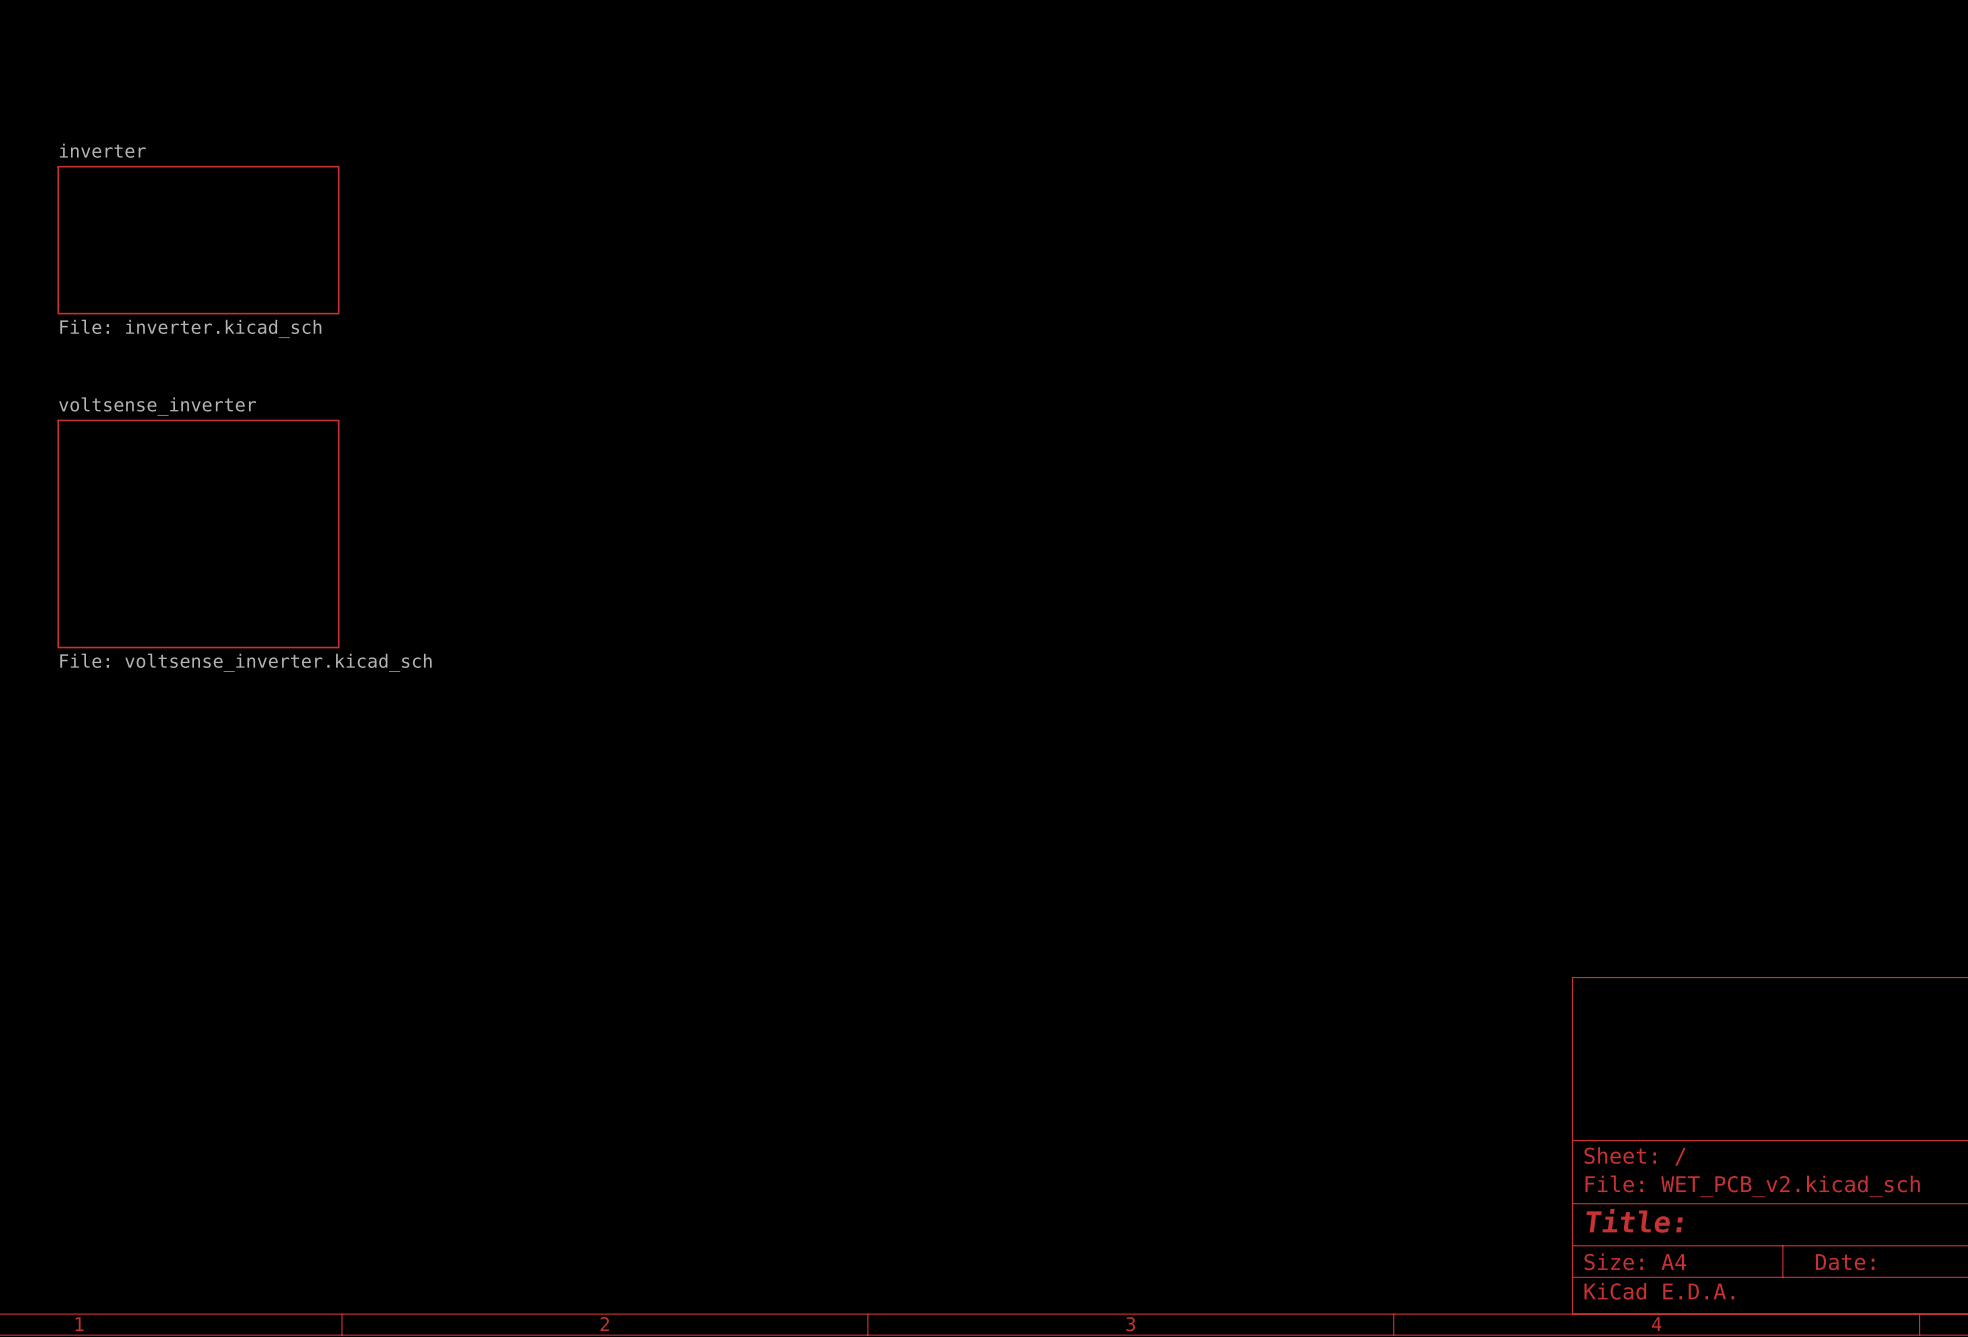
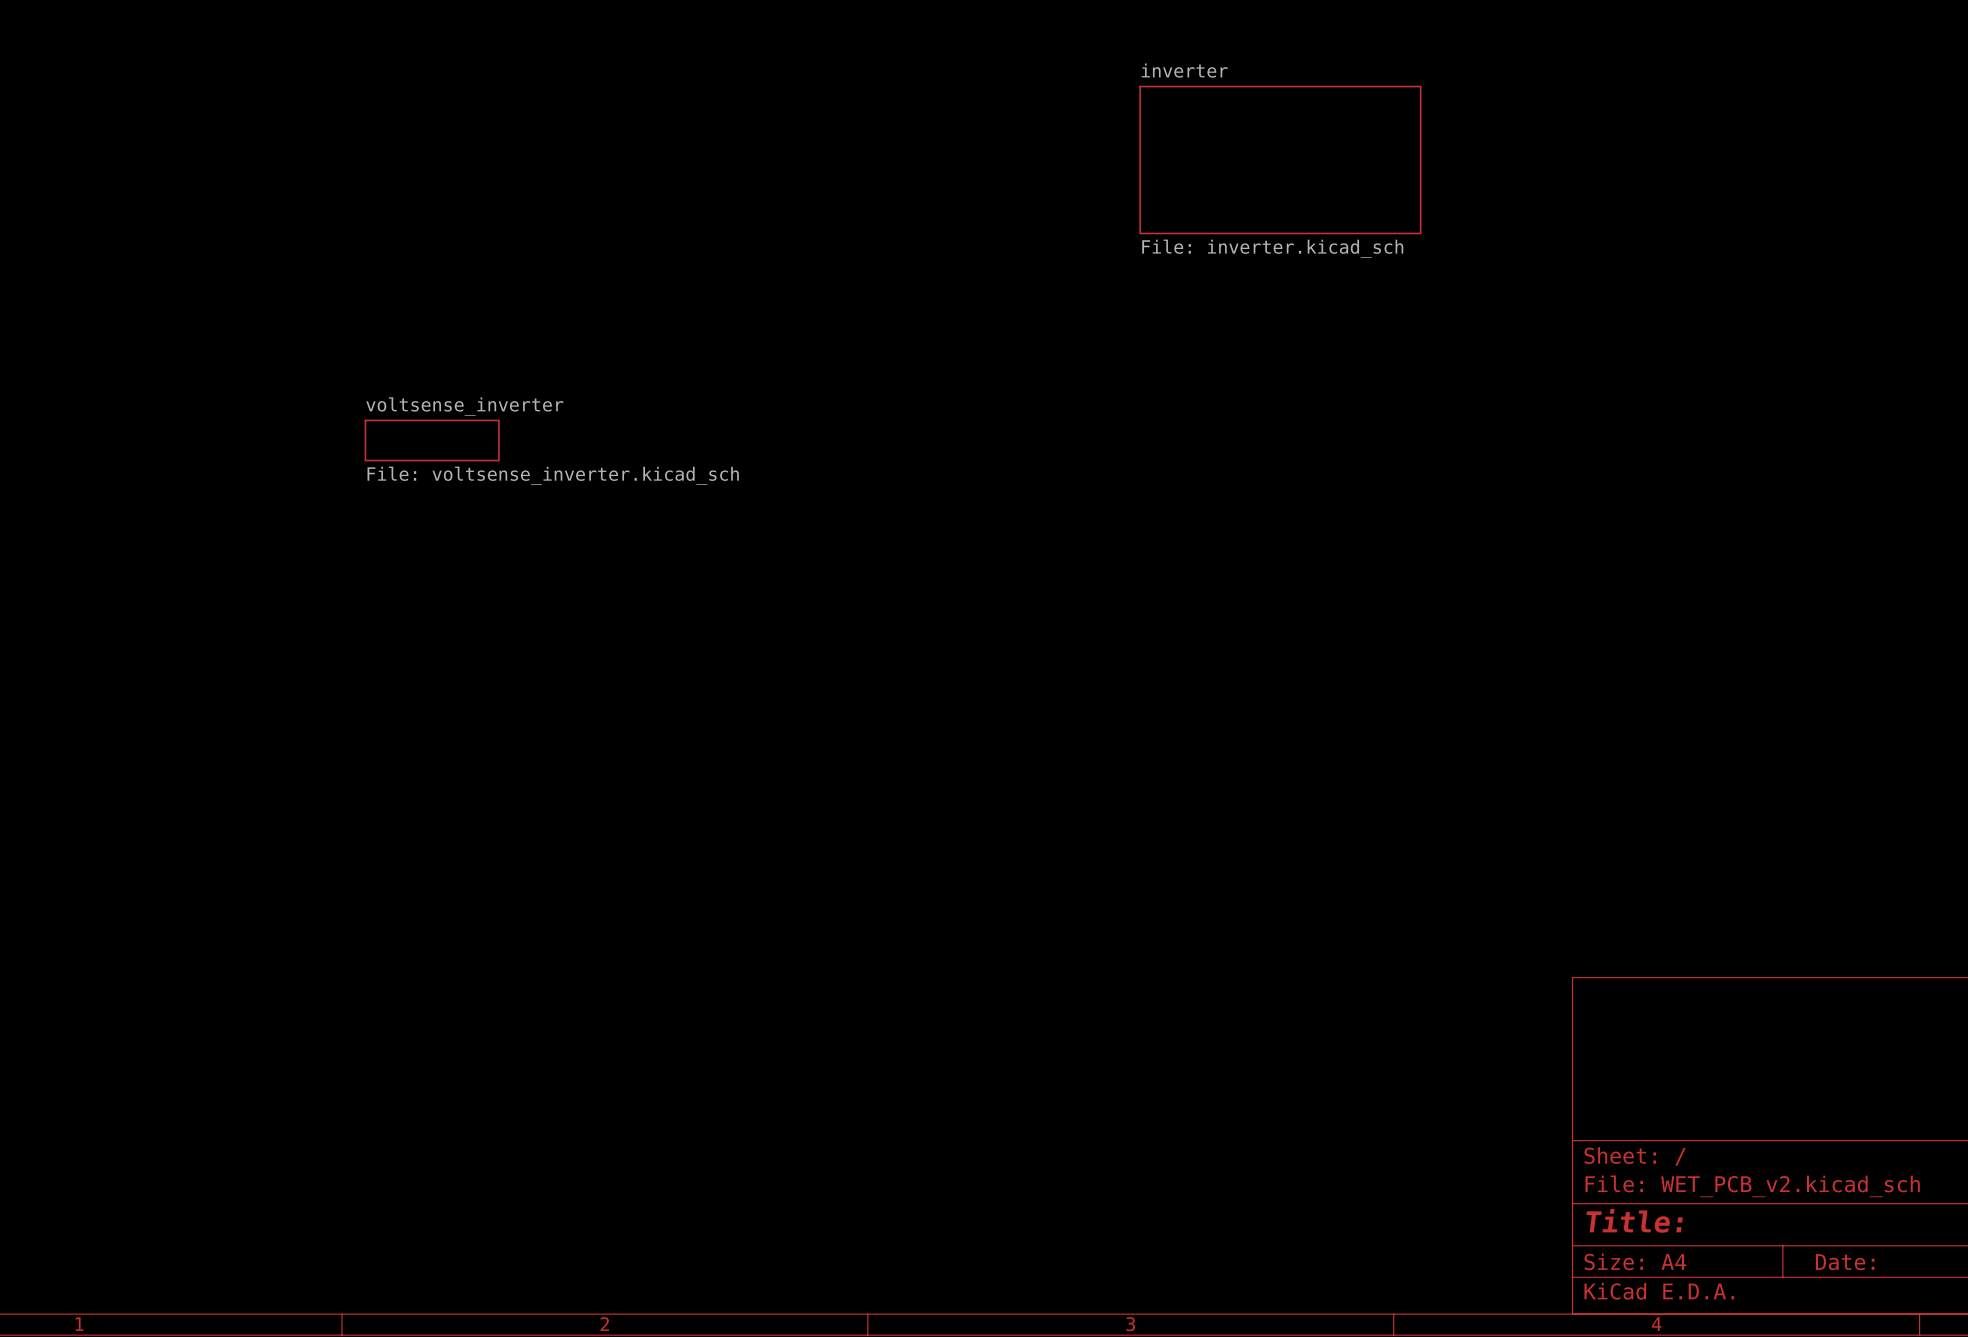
sheet inverter: none -> File: inverter.kicad_sch (1280, 160)
sheet inverter: File: inverter.kicad_sch (198, 240) -> none
sheet voltsense_inverter: none -> File: voltsense_inverter.kicad_sch (432, 440)
sheet voltsense_inverter: File: voltsense_inverter.kicad_sch (198, 534) -> none

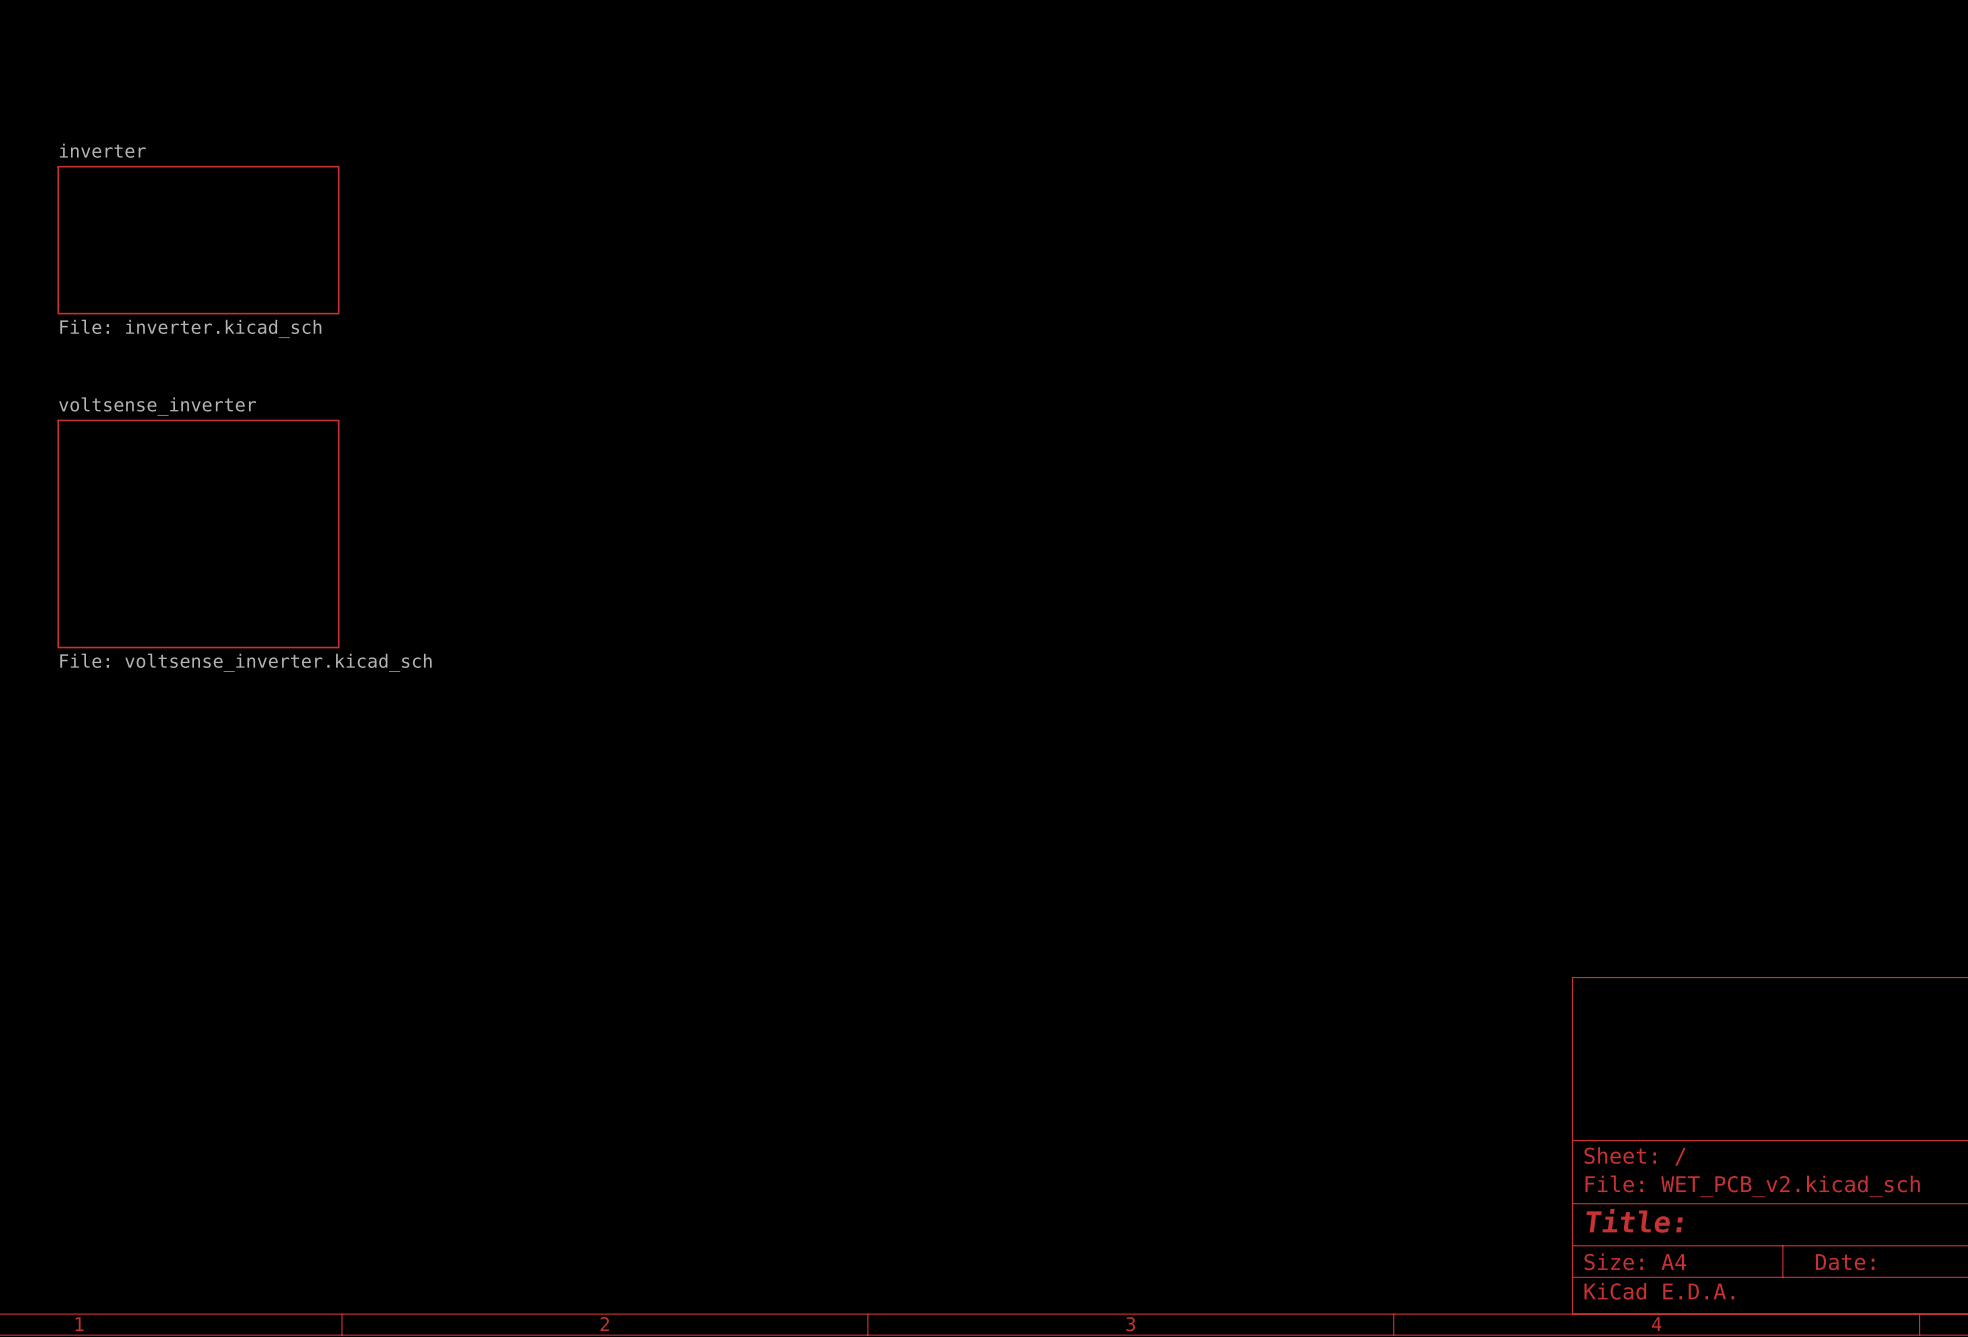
sheet inverter: File: inverter.kicad_sch (1280, 160) -> none
sheet inverter: none -> File: inverter.kicad_sch (198, 240)
sheet voltsense_inverter: File: voltsense_inverter.kicad_sch (432, 440) -> none
sheet voltsense_inverter: none -> File: voltsense_inverter.kicad_sch (198, 534)

